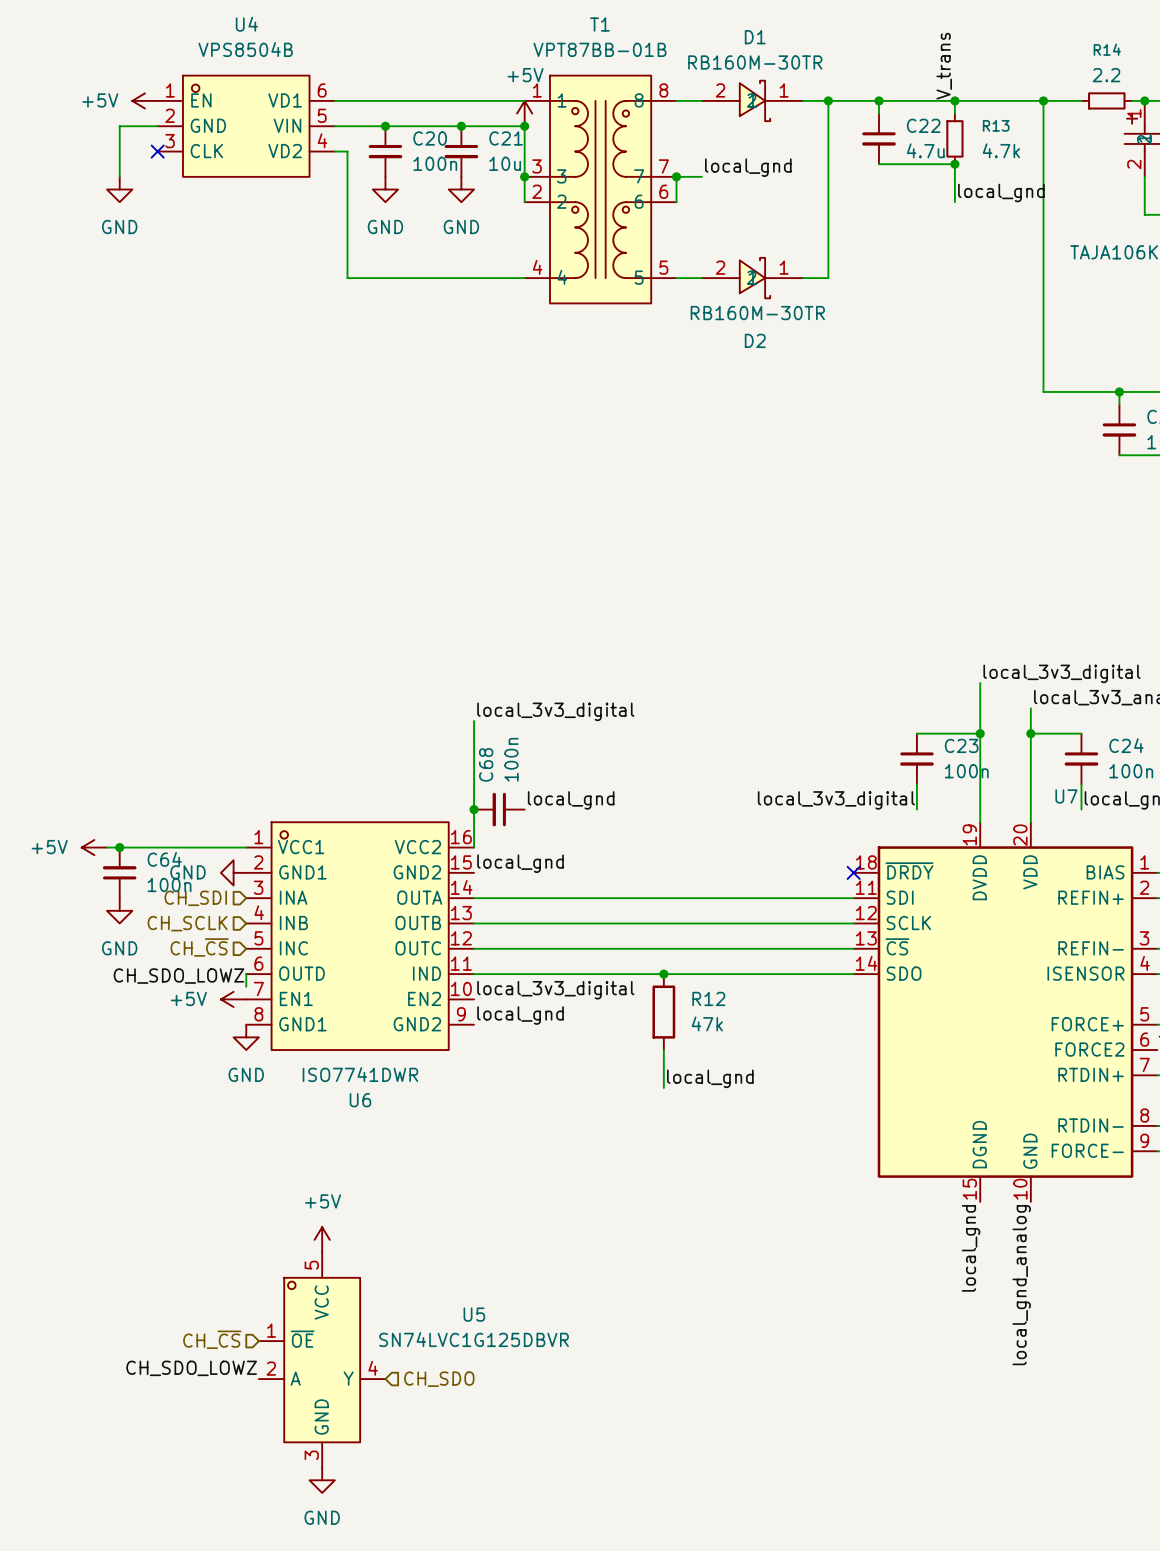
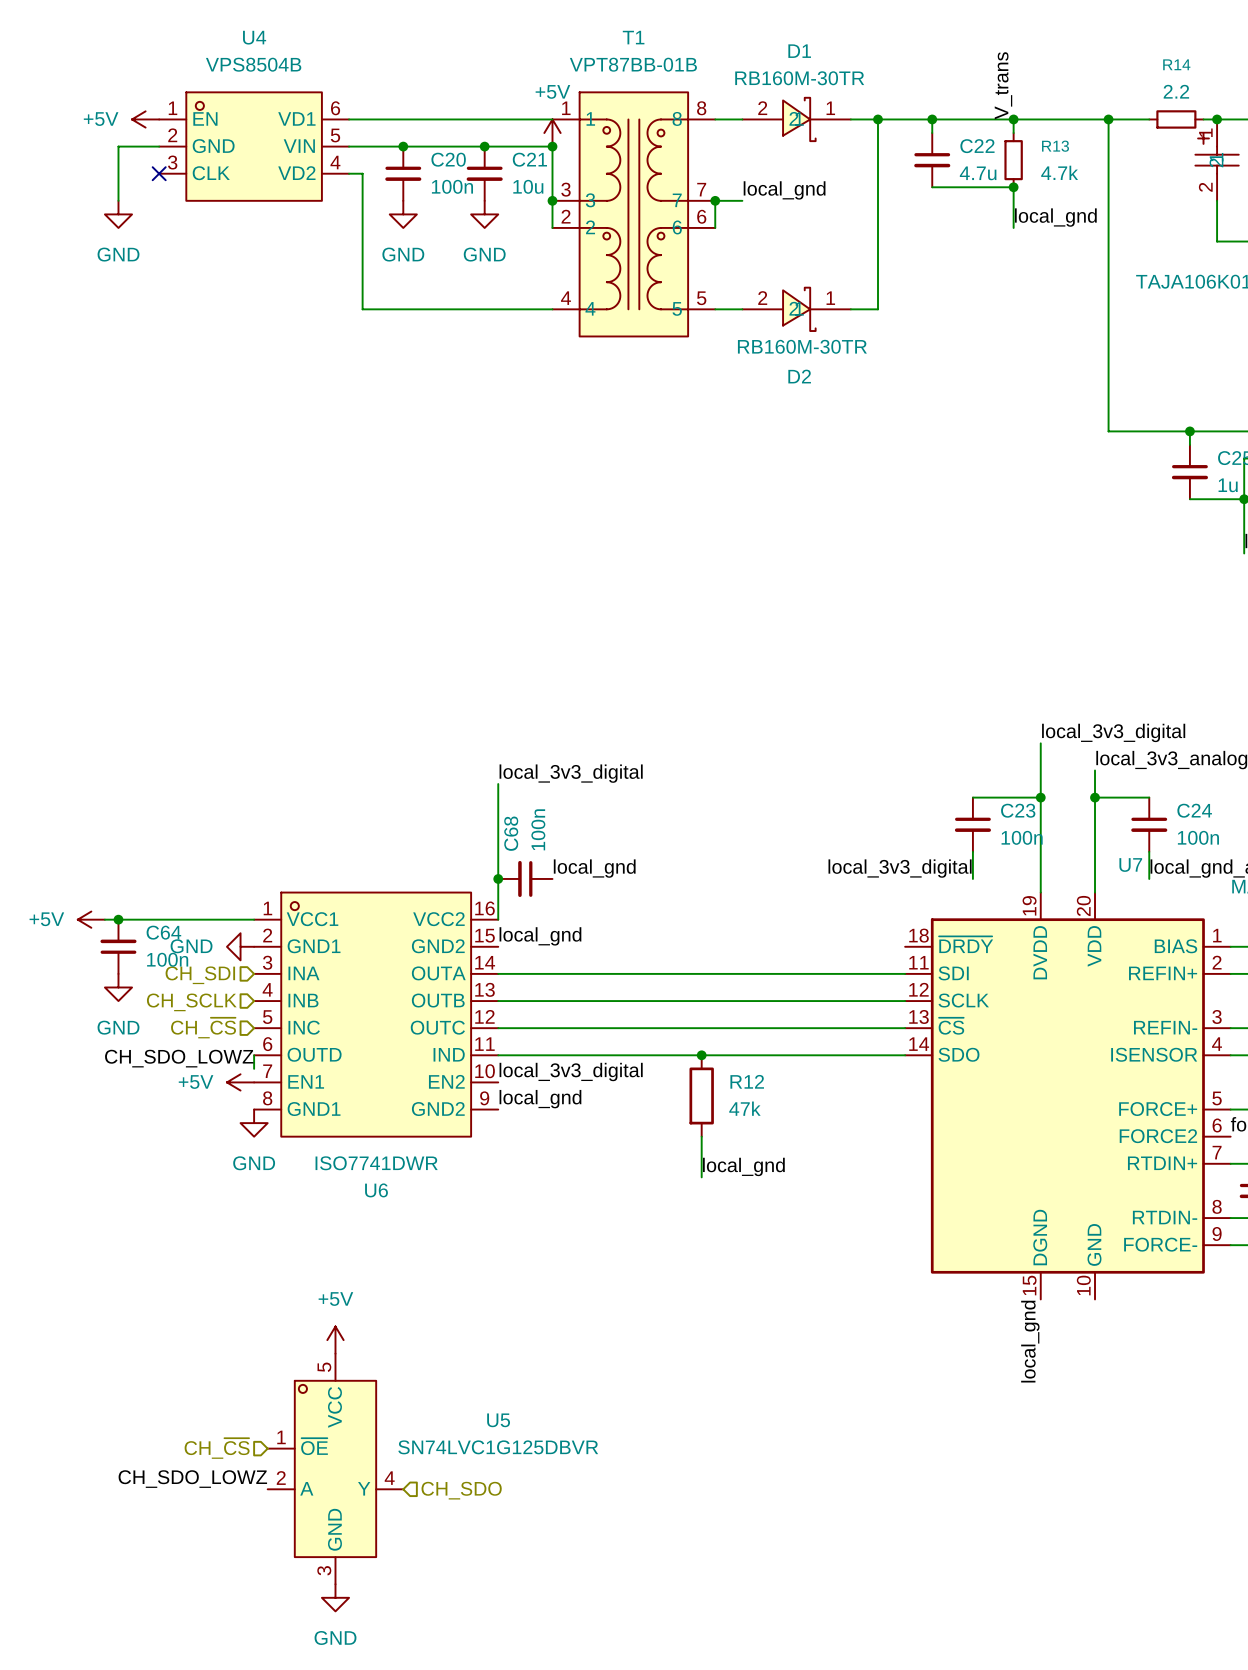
no-connect mark: (853, 872) -> none
label: local_gnd_analog (1021, 1285) -> none

